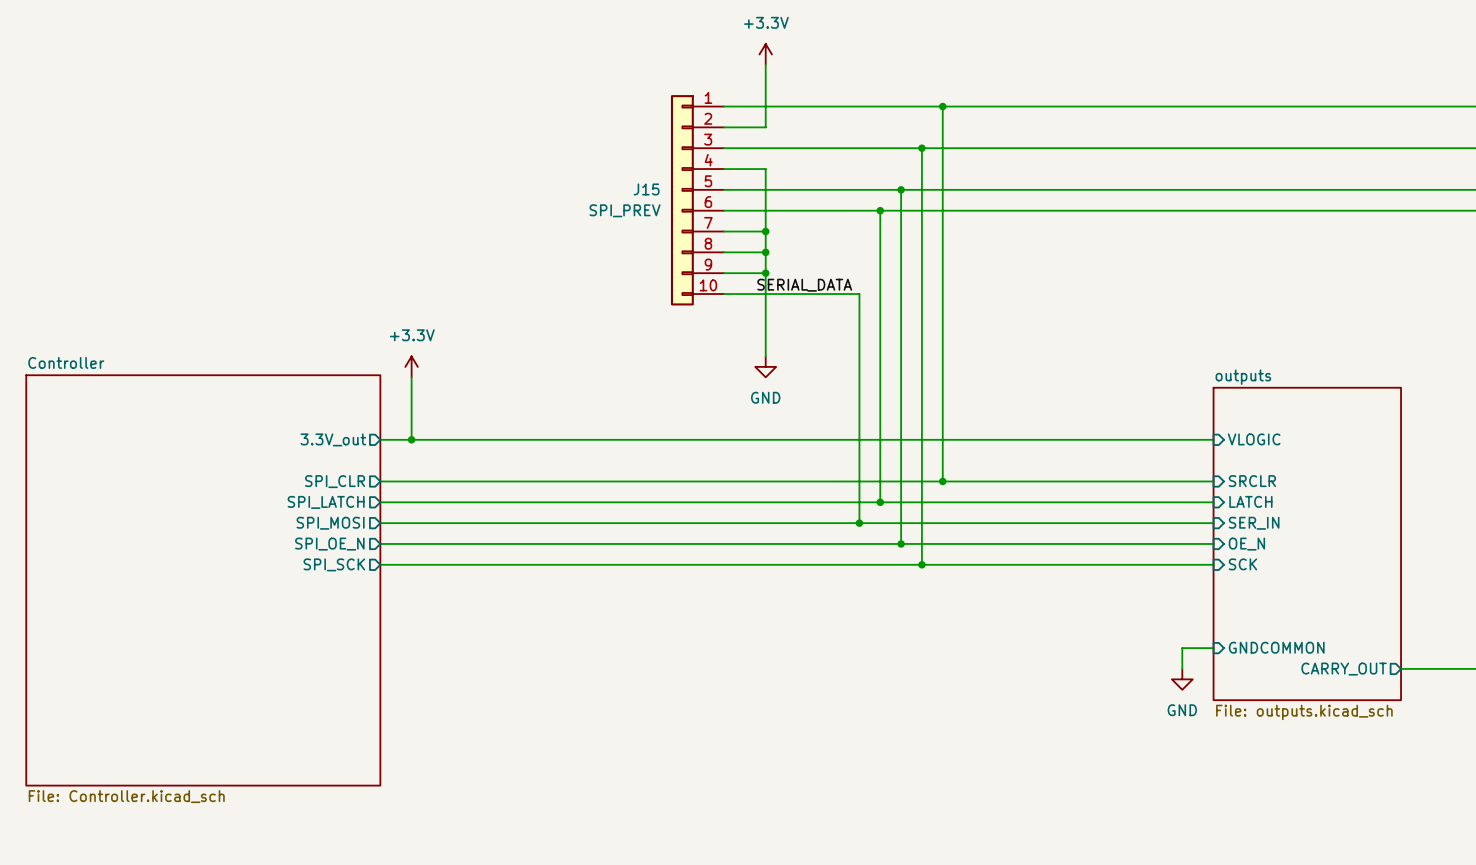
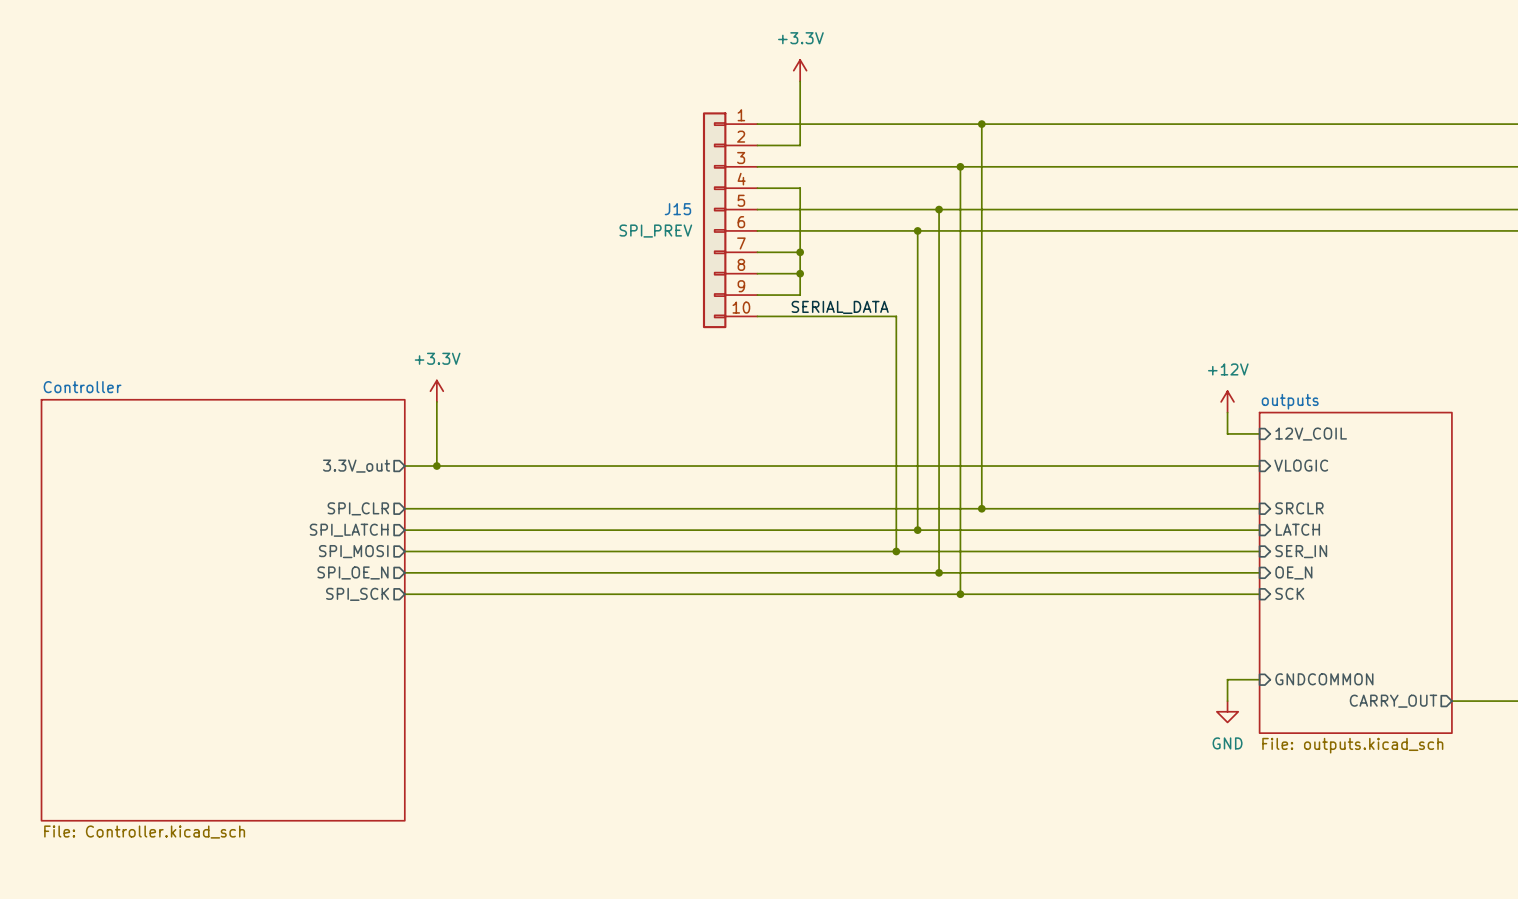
wire: (765, 273) (765, 356) -> none
junction: (765, 273) -> none
power symbol: GND (765, 366) -> none
power symbol: none -> +12V (1227, 401)
wire: none -> (1227, 412) (1227, 433) (1259, 433)
sheet pin: none -> 12V_COIL (1311, 434)

